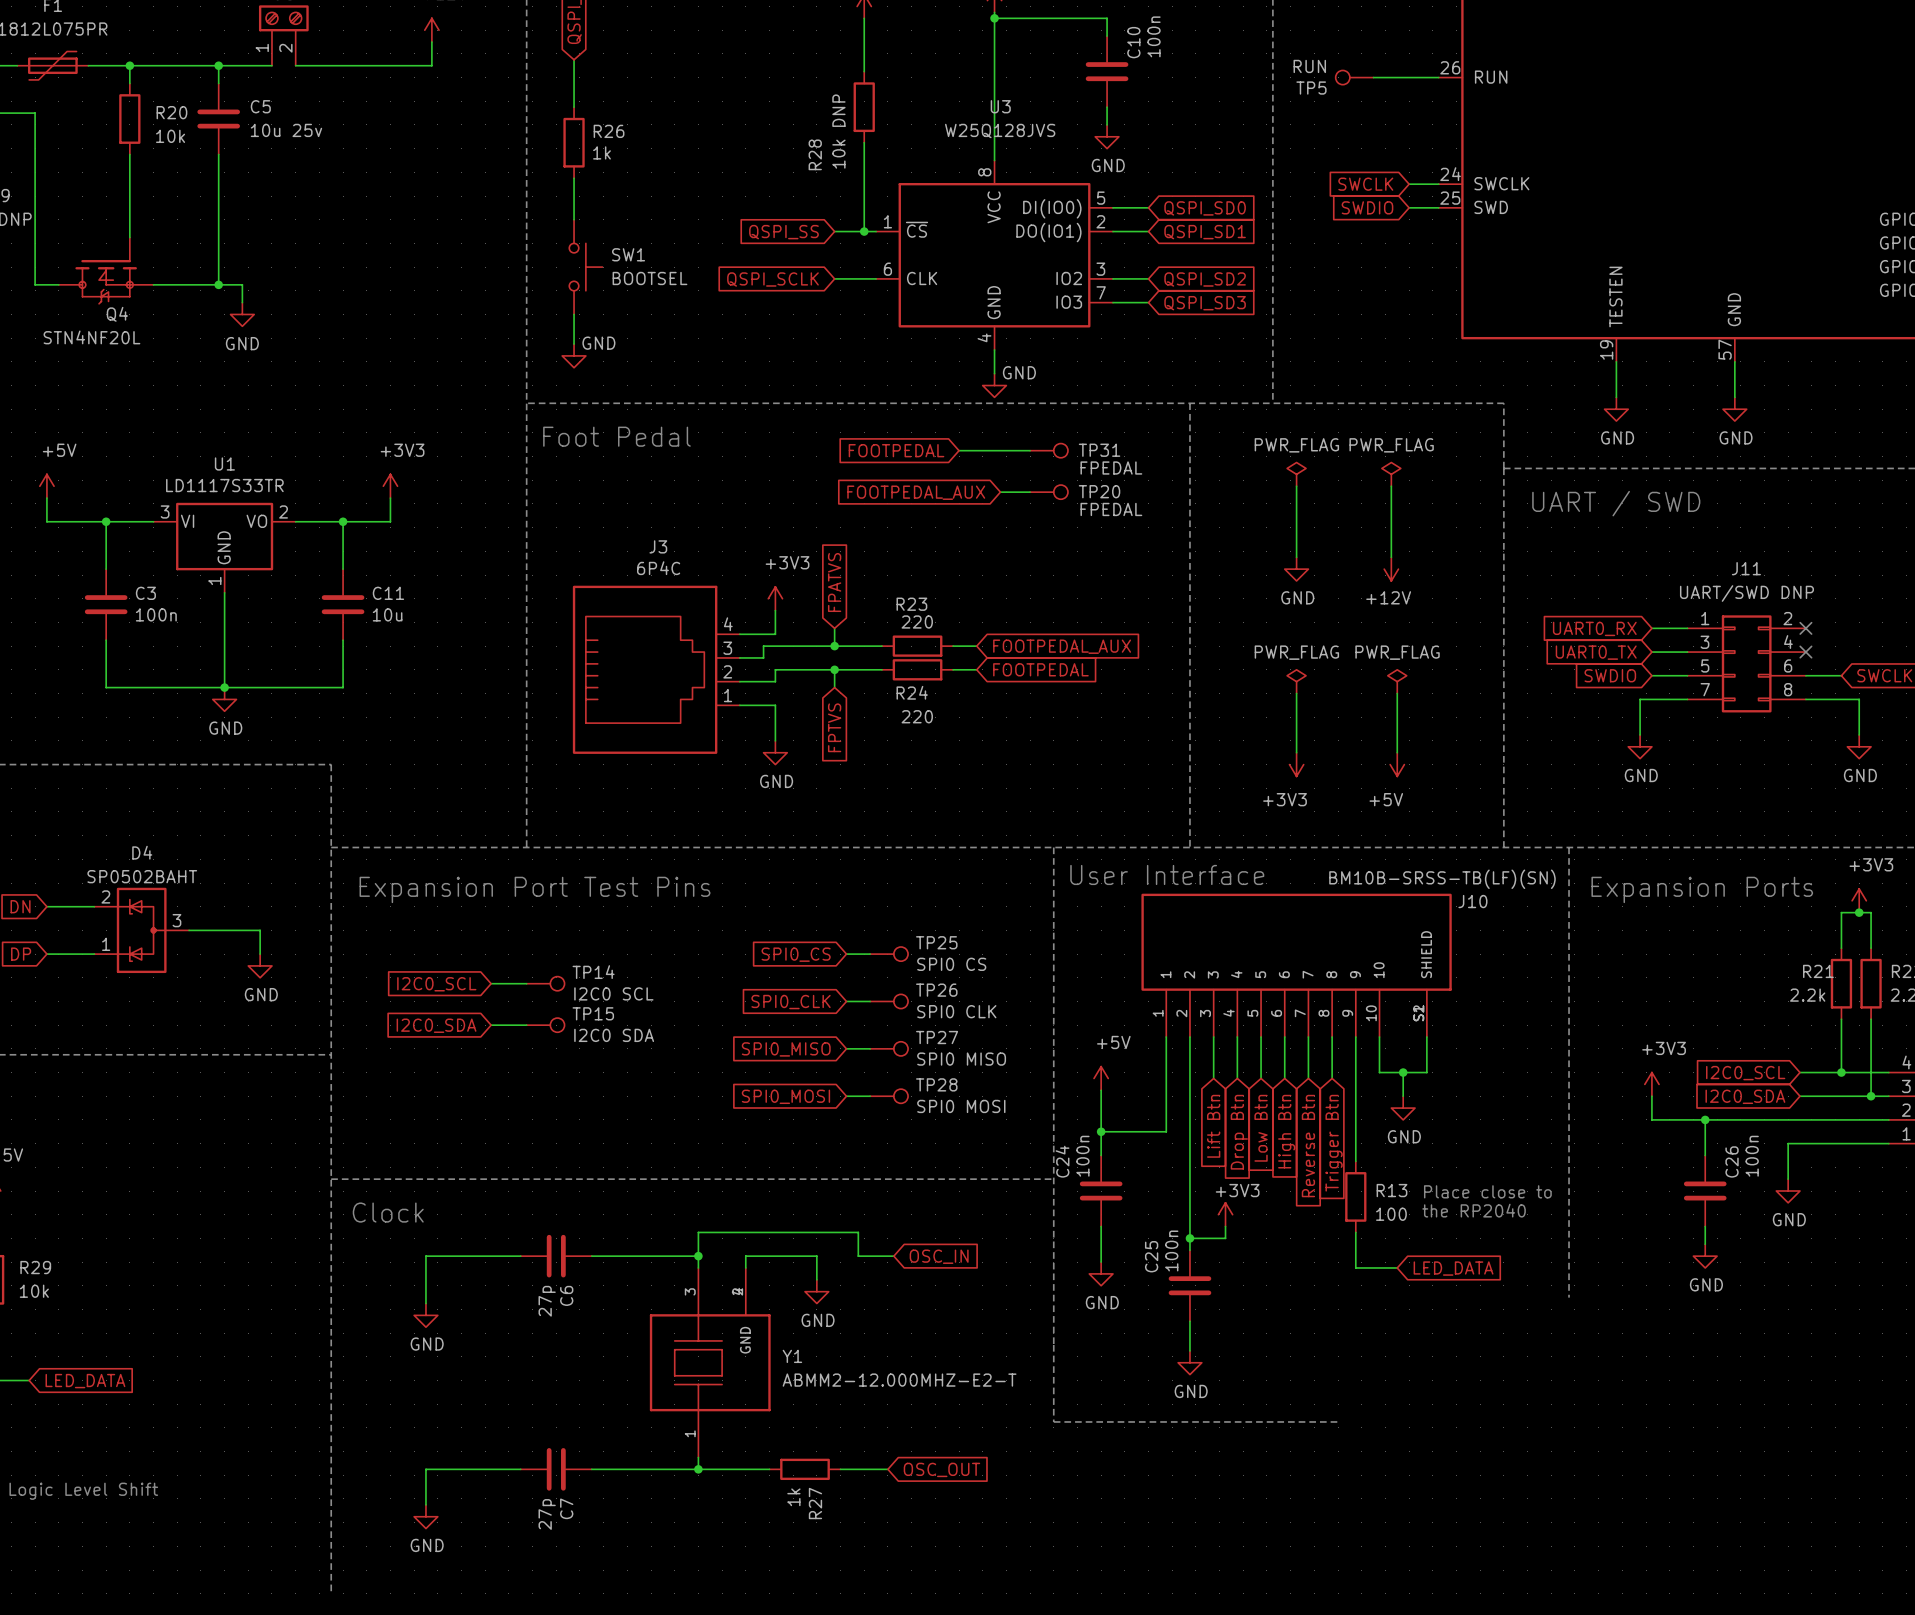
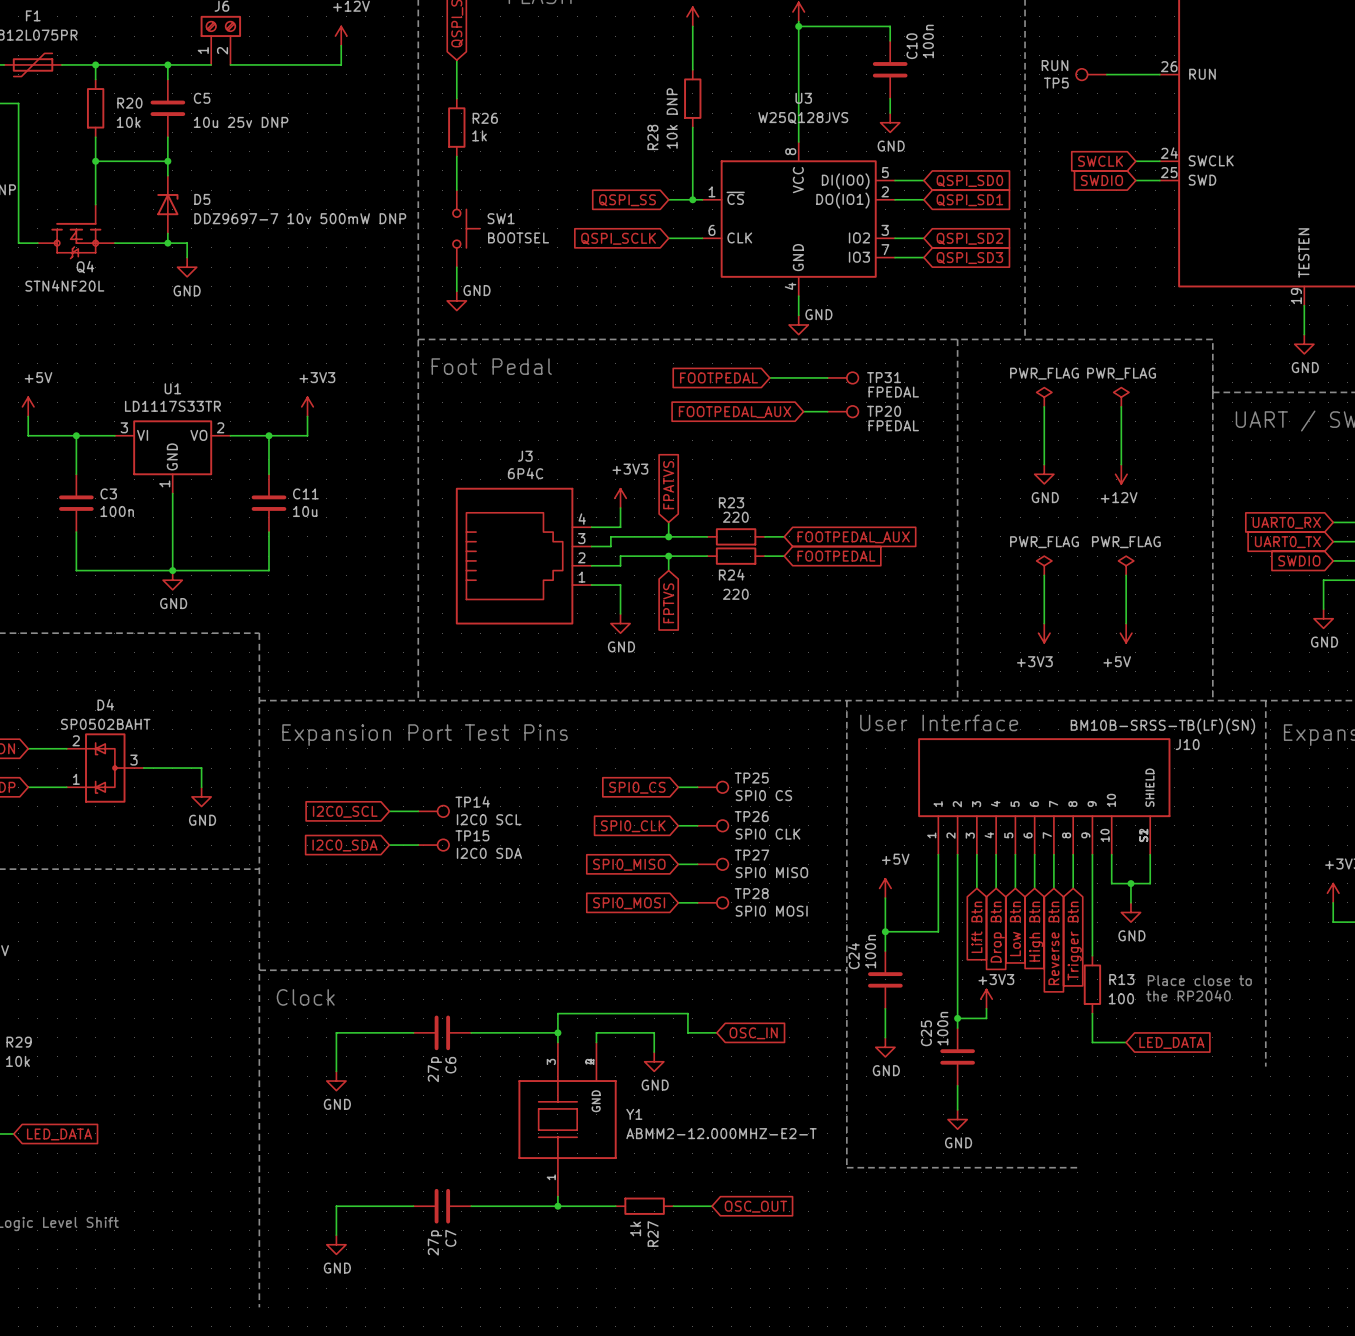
C5 value: 10u 25v (286, 130) -> 10u 25v DNP (241, 122)
wire: none -> (95, 161) (167, 161)
junction: none -> (95, 161)
junction: none -> (167, 161)
D5: none -> DDZ9697-7 10v 500mW DNP (167, 204)

